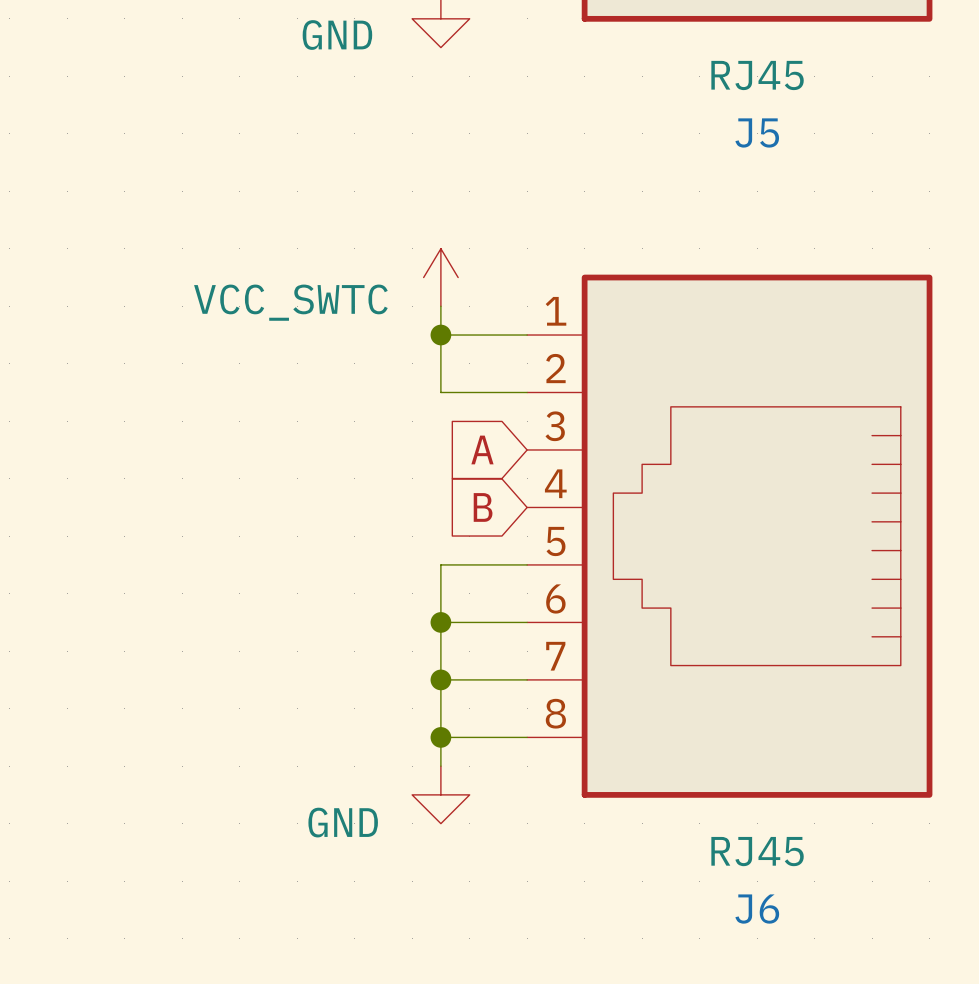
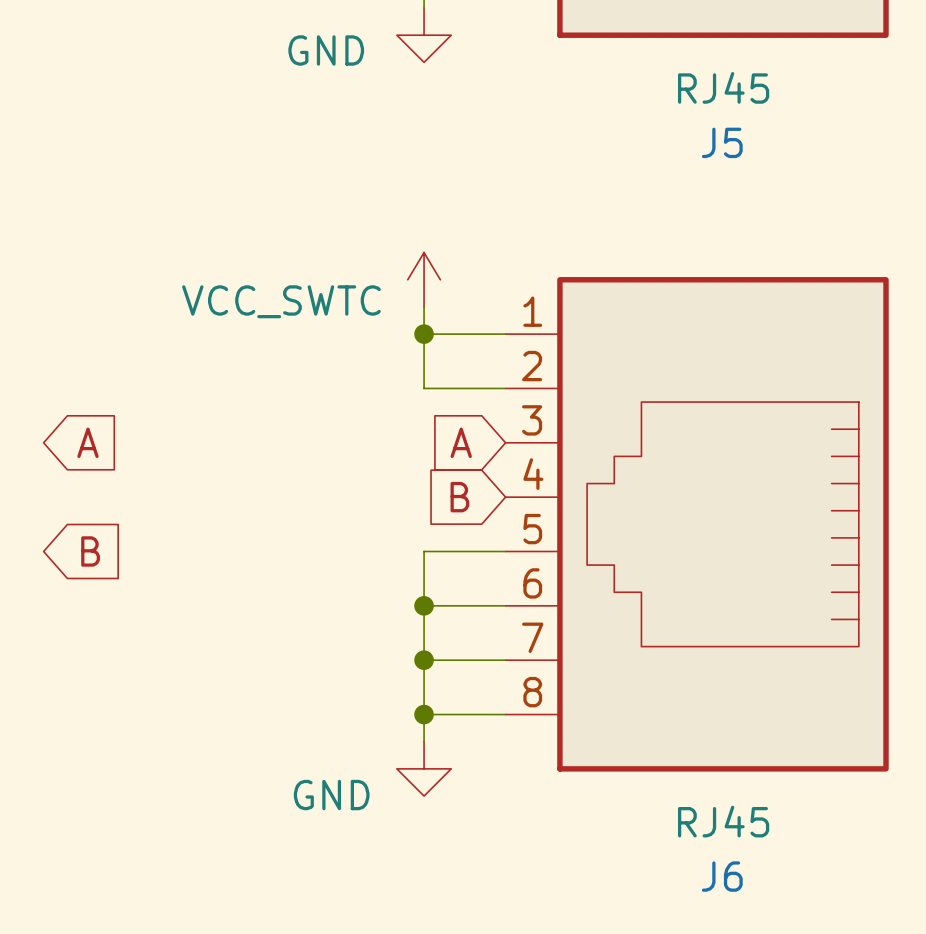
global label: none -> A (87, 442)
global label: none -> B (90, 551)

